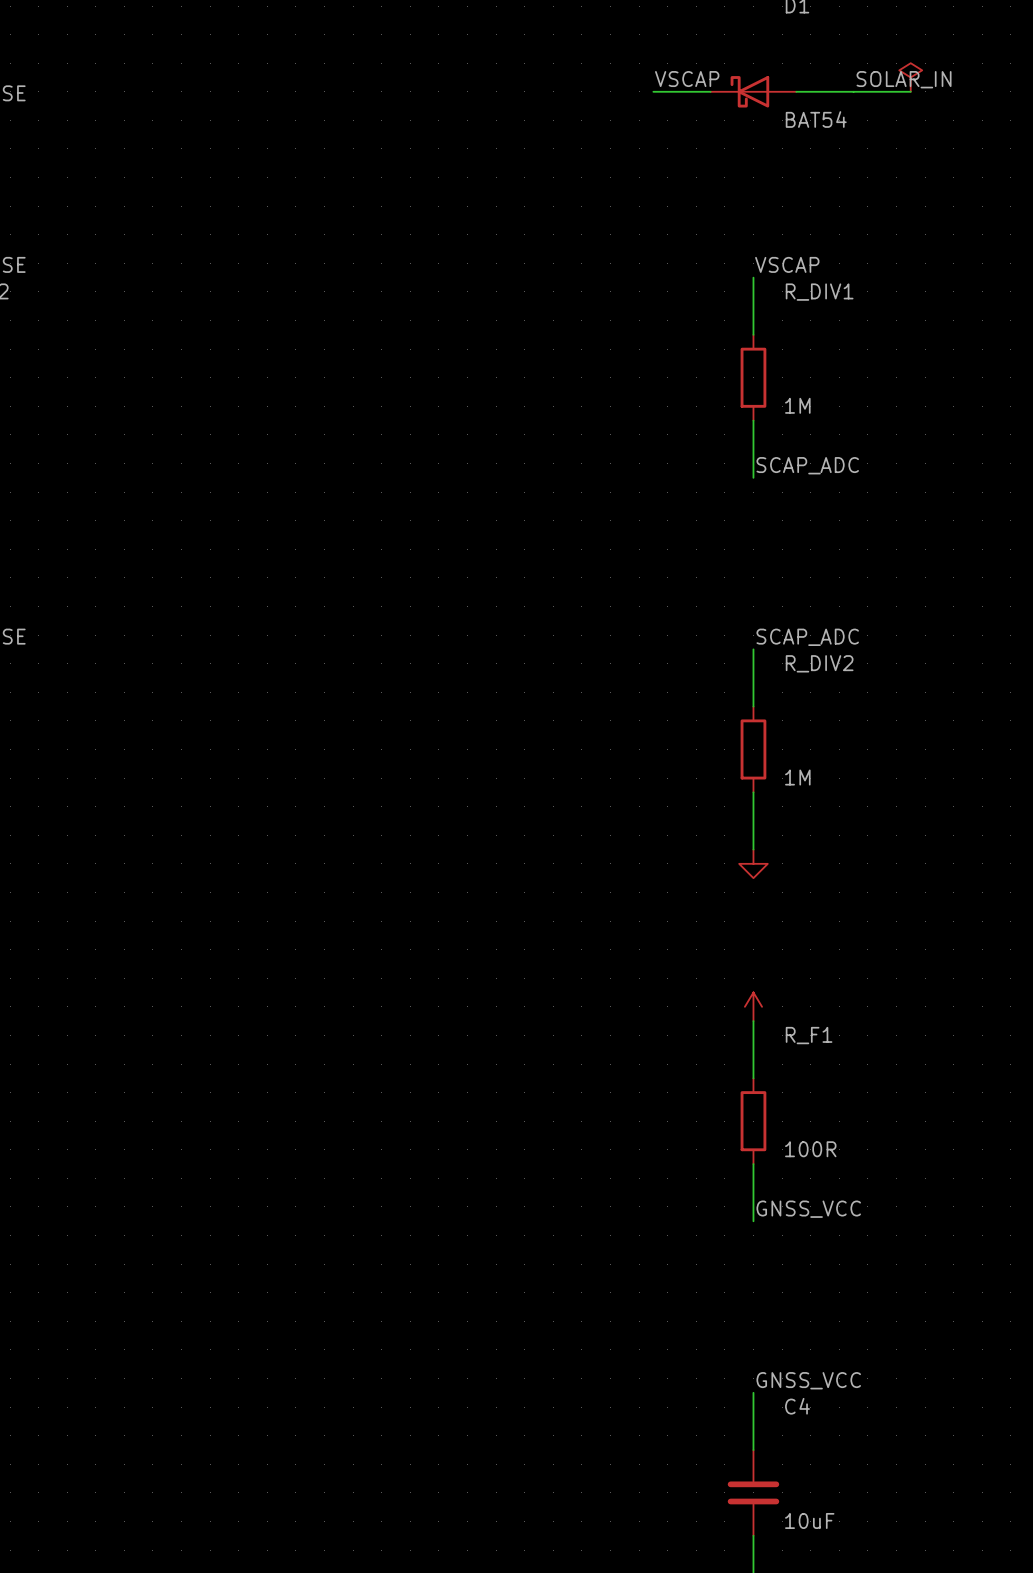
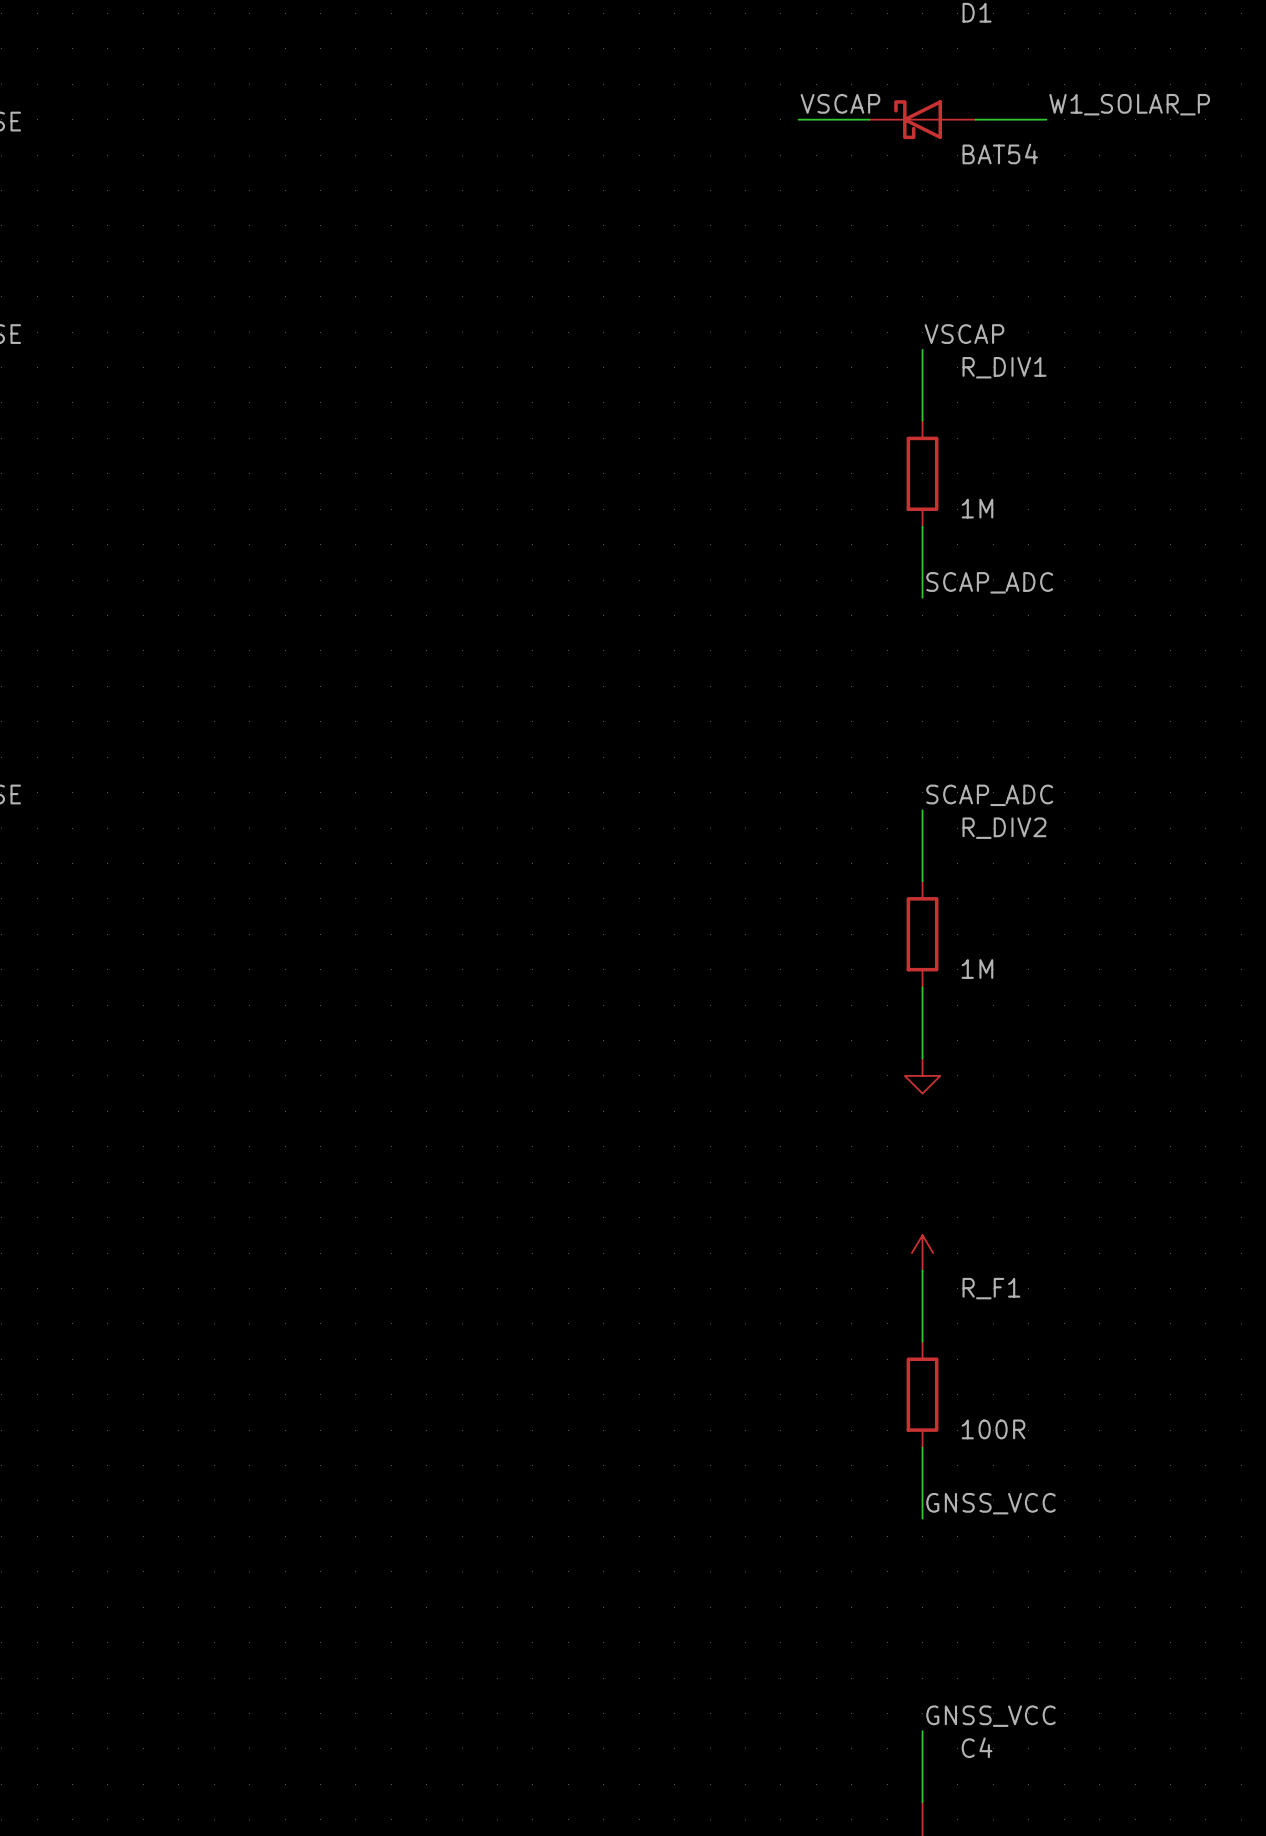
power symbol: (910, 77) -> none
label: SOLAR_IN (904, 79) -> W1_SOLAR_P (1129, 104)
wire: (853, 91) (910, 91) -> none

